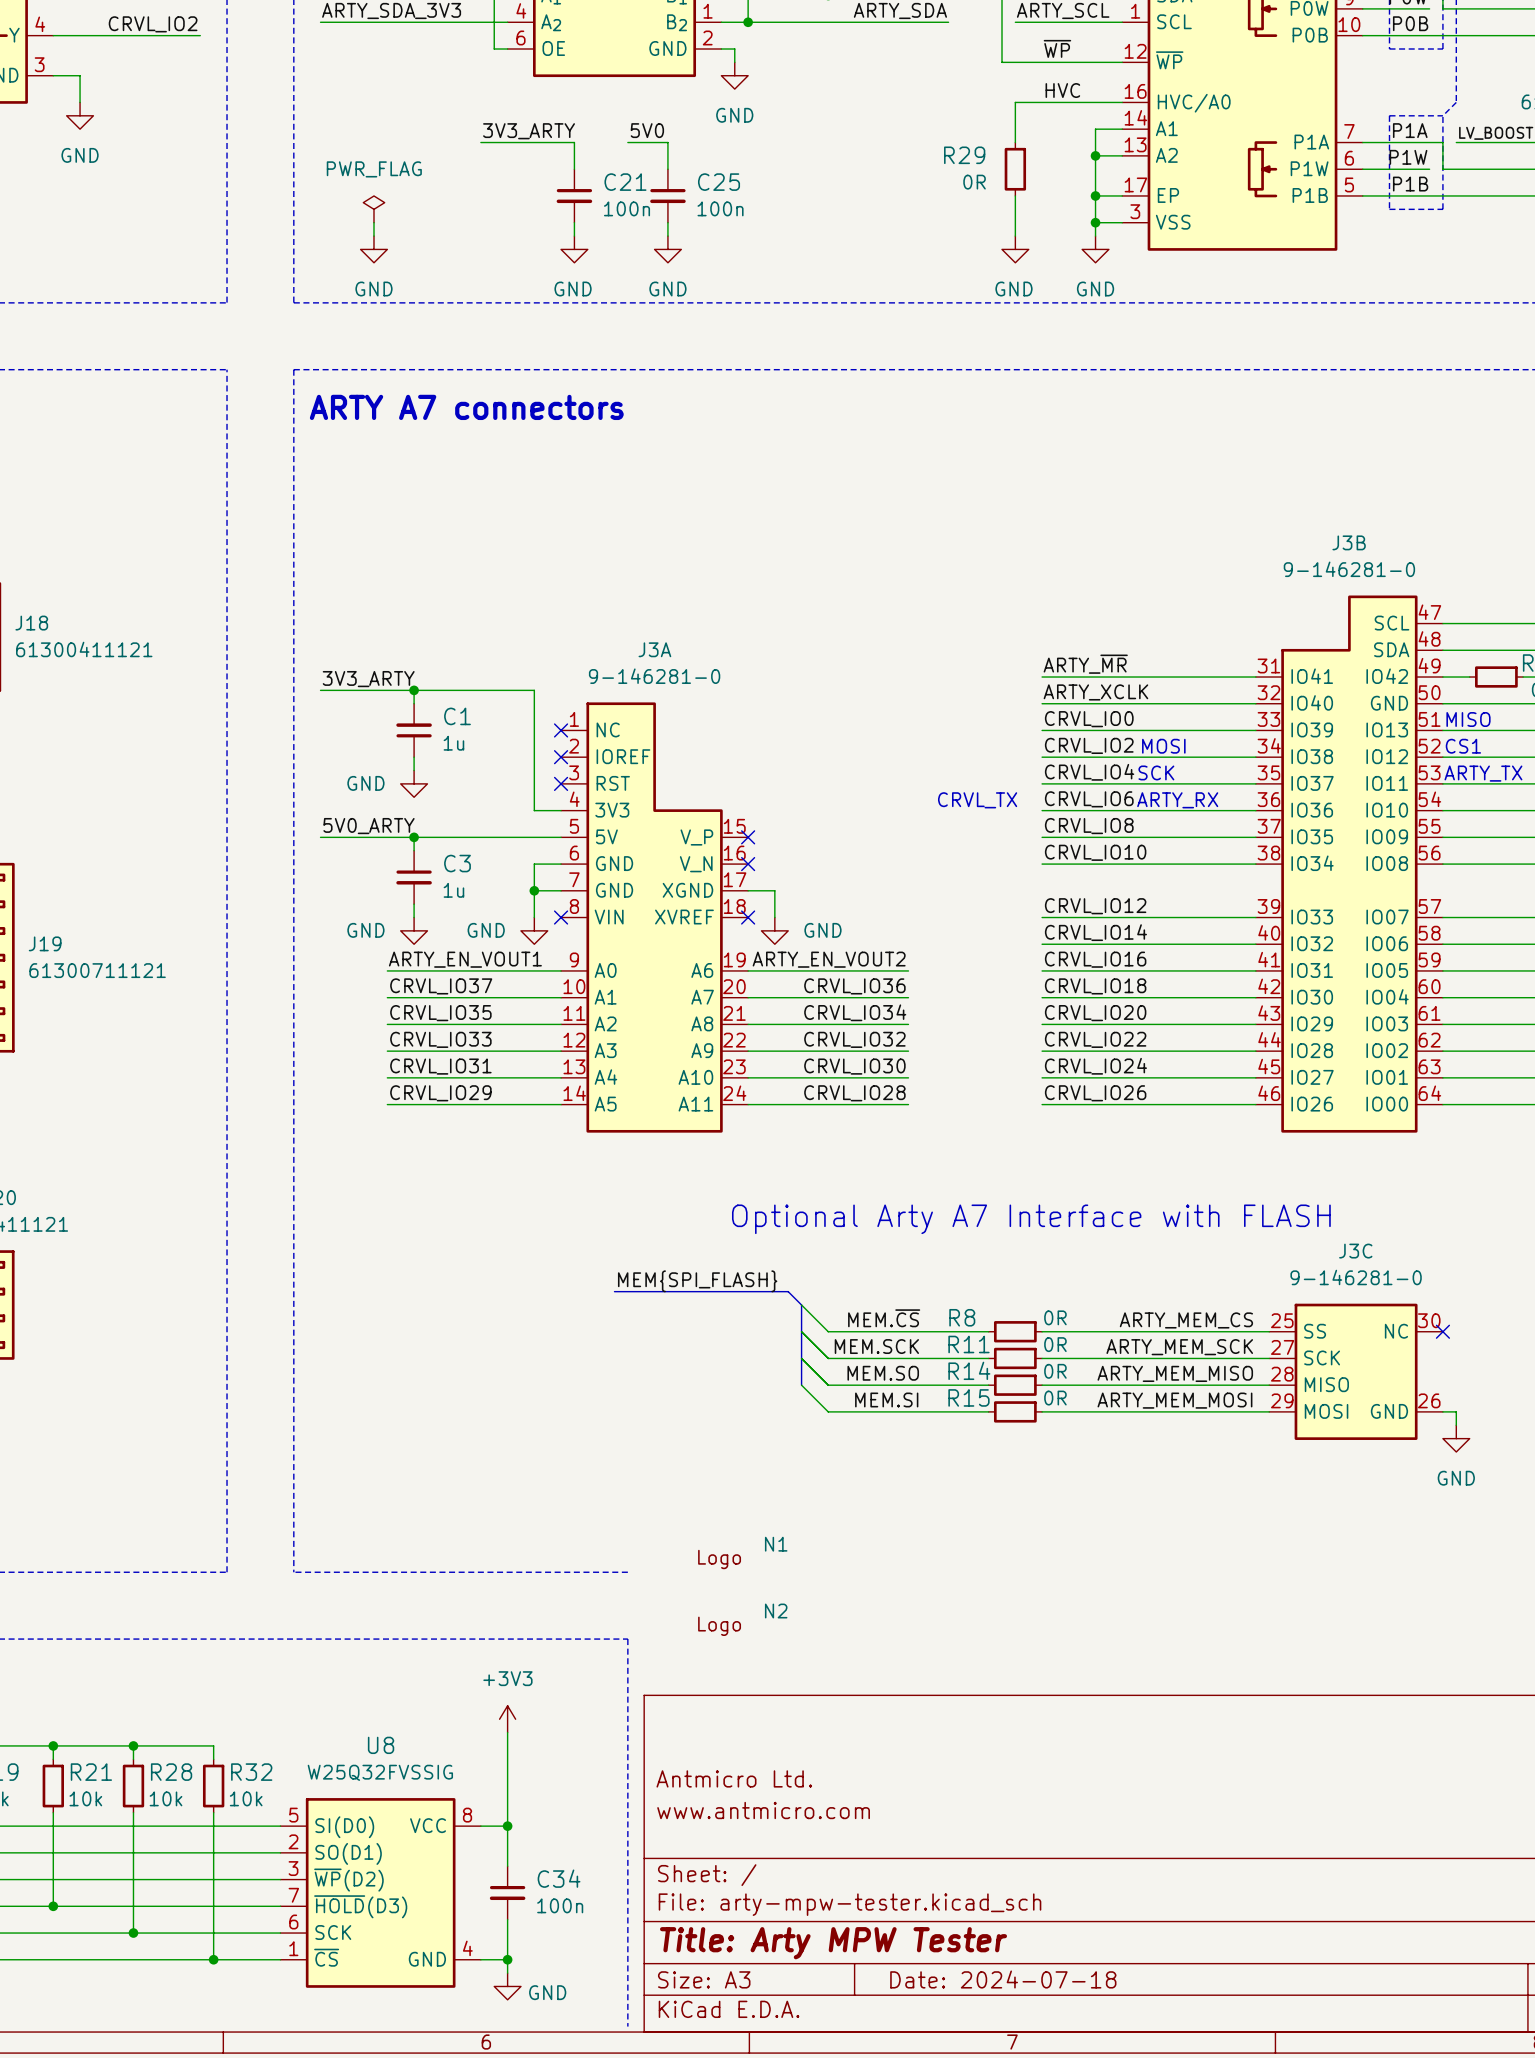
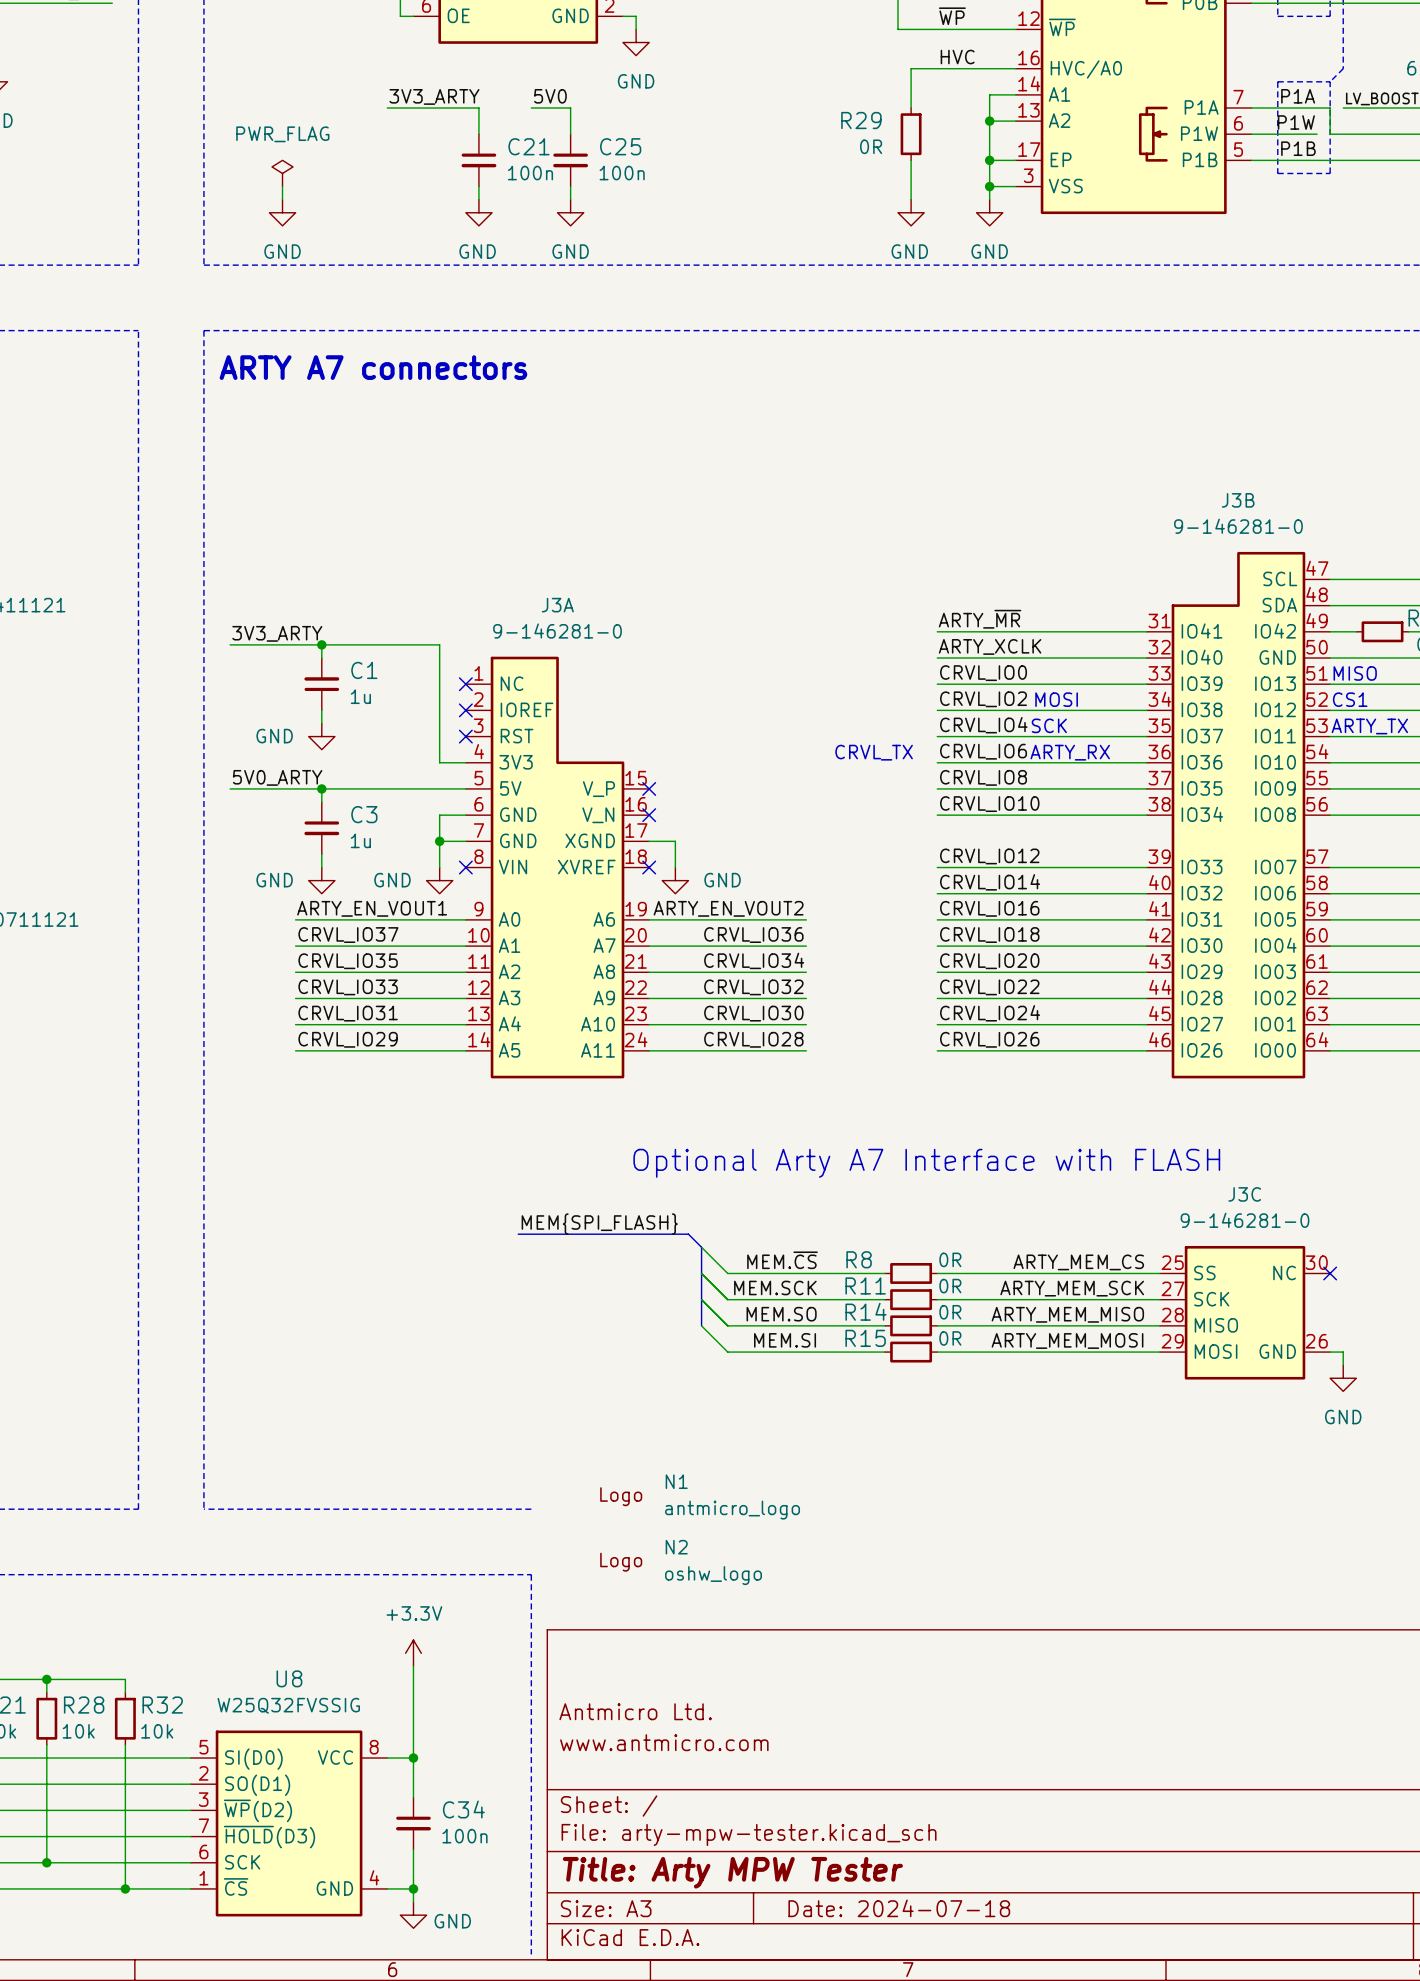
N1 value: none -> antmicro_logo (732, 1510)
N2 value: none -> oshw_logo (713, 1575)
power symbol: +3V3 (507, 1719) -> +3.3V (413, 1653)

